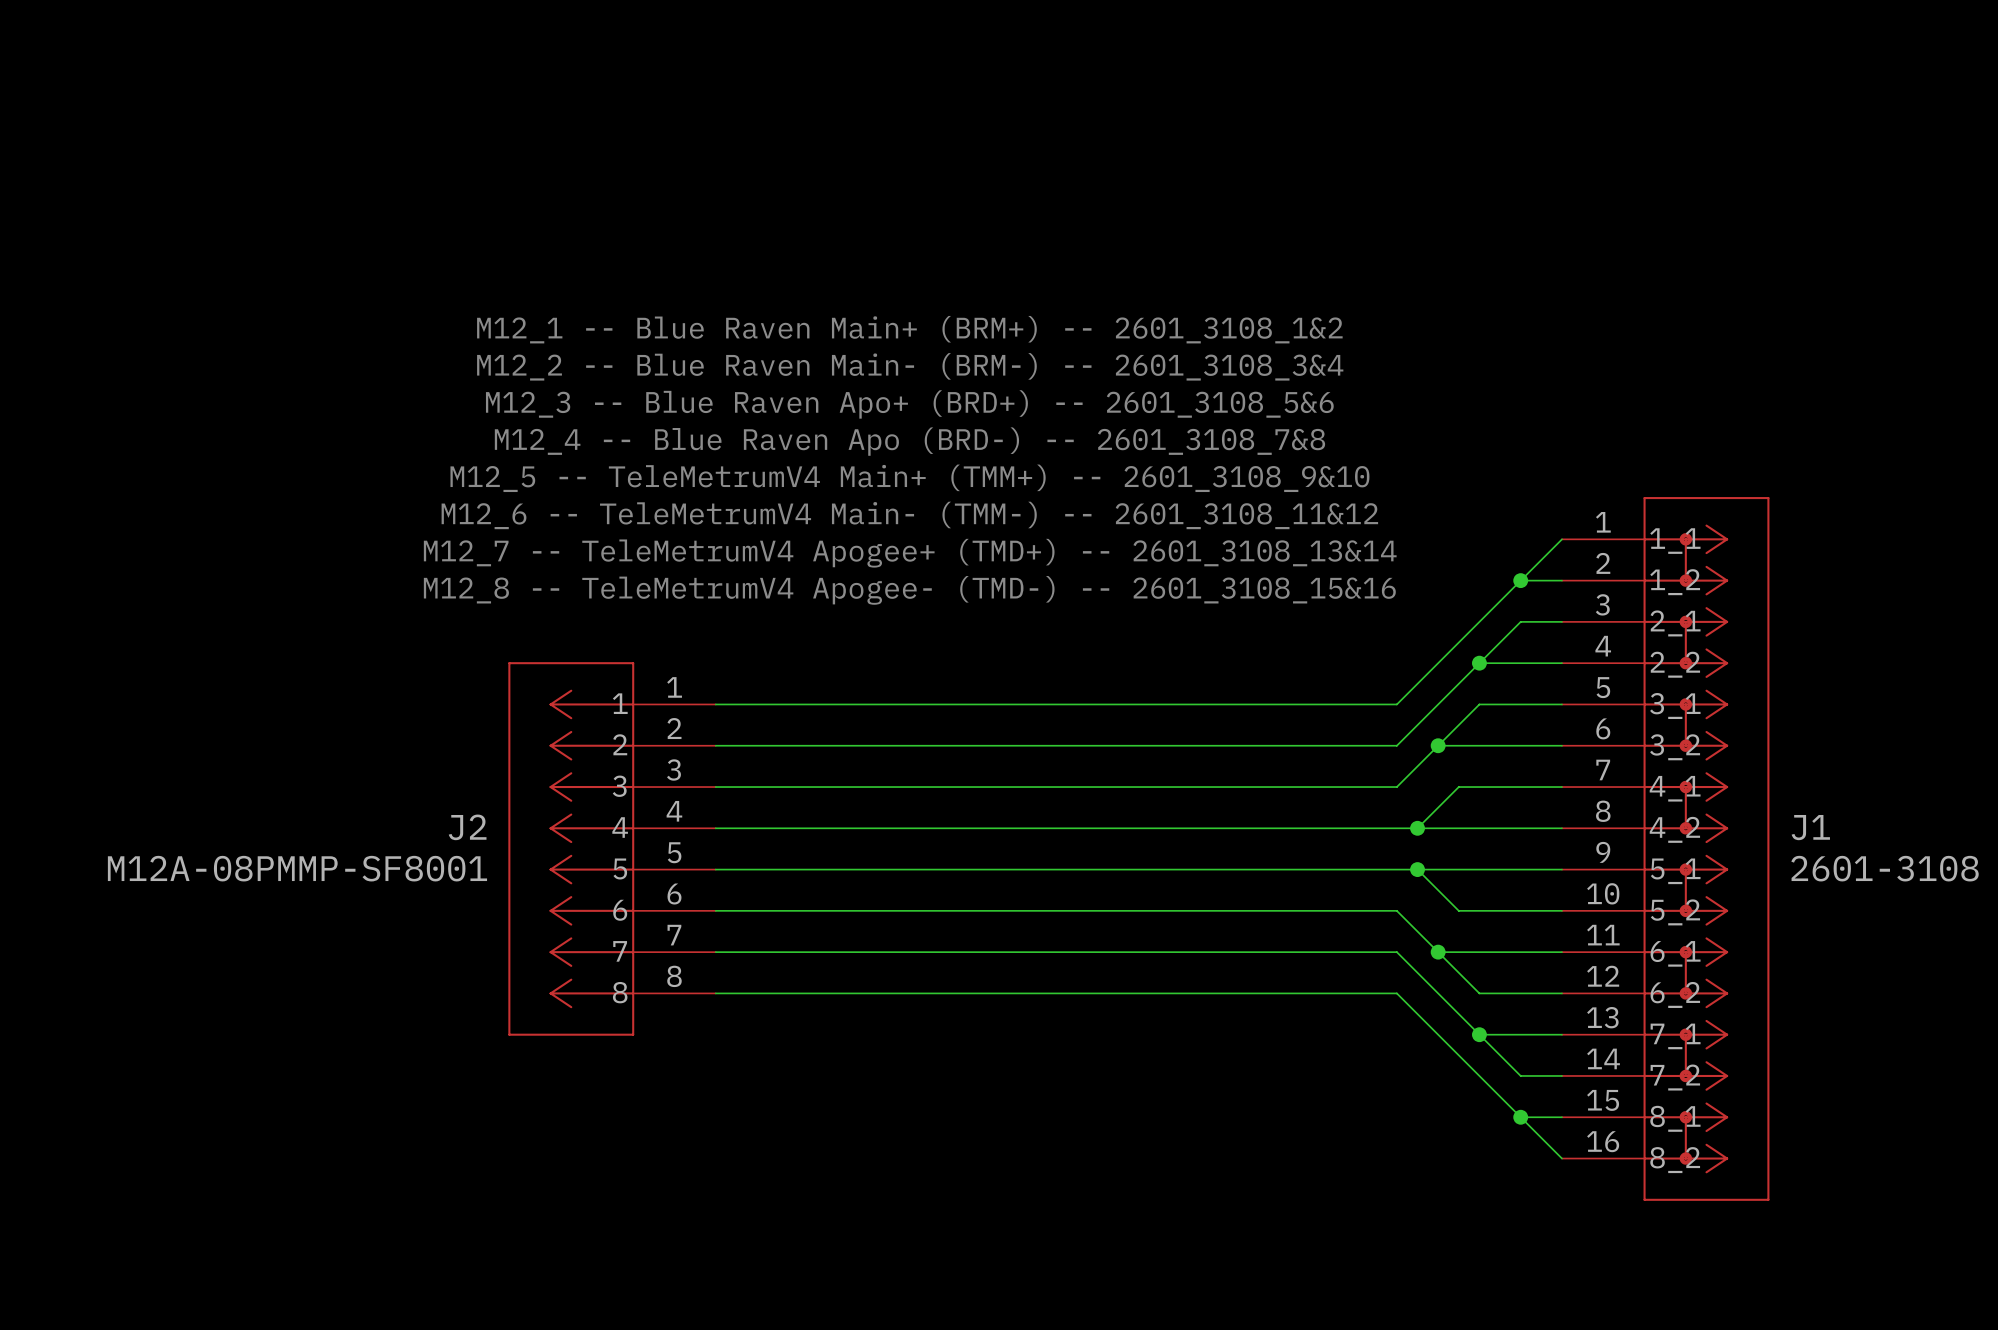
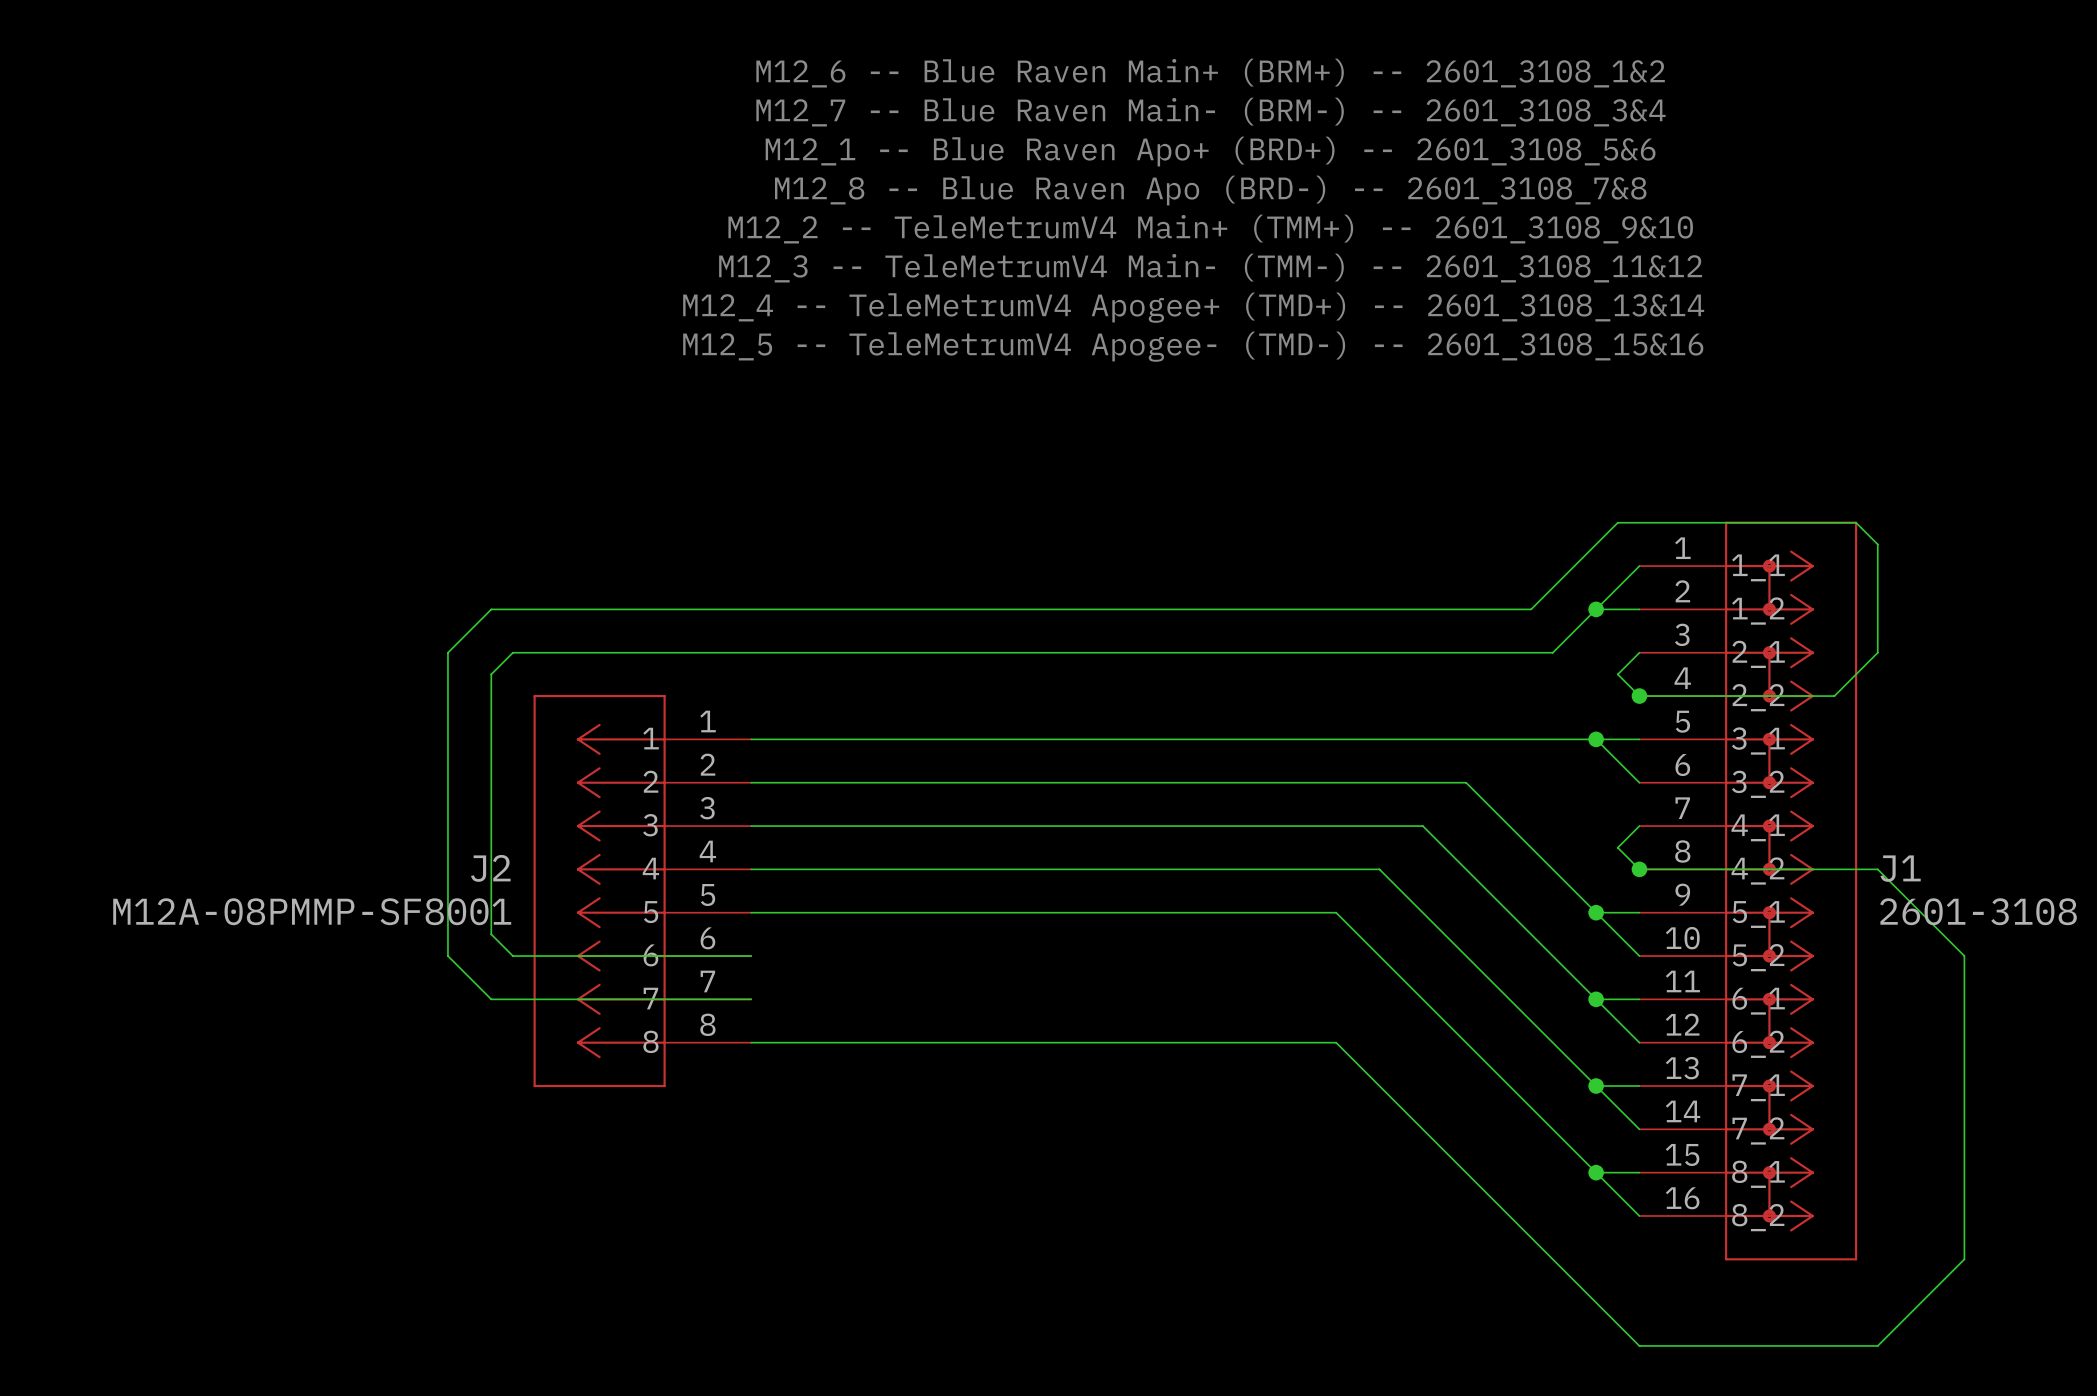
text: none -> M12_6 -- Blue Raven Main+ (BRM+) -- 2601_3108_1&2 (1210, 73)
text: none -> M12_7 -- Blue Raven Main- (BRM-) -- 2601_3108_3&4 (1210, 112)
text: none -> M12_1 -- Blue Raven Apo+ (BRD+) -- 2601_3108_5&6 (1210, 151)
text: none -> M12_8 -- Blue Raven Apo (BRD-) -- 2601_3108_7&8 (1210, 190)
text: none -> M12_2 -- TeleMetrumV4 Main+ (TMM+) -- 2601_3108_9&10 (1210, 229)
text: none -> M12_3 -- TeleMetrumV4 Main- (TMM-) -- 2601_3108_11&12 (1210, 268)
text: none -> M12_4 -- TeleMetrumV4 Apogee+ (TMD+) -- 2601_3108_13&14 (1193, 307)
text: M12_1 -- Blue Raven Main+ (BRM+) -- 2601_3108_1&2 (909, 329) -> none
text: none -> M12_5 -- TeleMetrumV4 Apogee- (TMD-) -- 2601_3108_15&16 (1193, 346)
text: M12_2 -- Blue Raven Main- (BRM-) -- 2601_3108_3&4 (910, 366) -> none
text: M12_3 -- Blue Raven Apo+ (BRD+) -- 2601_3108_5&6 (909, 404) -> none
text: M12_4 -- Blue Raven Apo (BRD-) -- 2601_3108_7&8 (909, 441) -> none
text: M12_5 -- TeleMetrumV4 Main+ (TMM+) -- 2601_3108_9&10 (909, 478) -> none
text: M12_6 -- TeleMetrumV4 Main- (TMM-) -- 2601_3108_11&12 (909, 515) -> none
text: M12_7 -- TeleMetrumV4 Apogee+ (TMD+) -- 2601_3108_13&14 (910, 553) -> none
text: M12_8 -- TeleMetrumV4 Apogee- (TMD-) -- 2601_3108_15&16 (909, 590) -> none
wire: (1479, 621) (1396, 704) -> (1552, 739) (1466, 739)
wire: (1562, 621) (1520, 621) (1396, 745) -> none
wire: (1479, 663) (1562, 663) -> none
junction: (1479, 663) -> none
junction: none -> (1639, 696)
wire: (1479, 704) (1396, 787) (1355, 787) -> (1639, 1042) (1422, 826)
junction: none -> (1596, 739)
wire: (1438, 745) (1562, 745) -> (1596, 739) (1639, 782)
junction: (1438, 745) -> none
wire: (1562, 787) (1458, 787) (1417, 828) -> (1639, 826) (1617, 847) (1639, 869) (1877, 869) (1964, 956) (1964, 1259) (1877, 1345) (1639, 1345) (1336, 1042)
wire: (1314, 828) (1562, 828) -> (1379, 869) (1466, 956)
junction: (1417, 828) -> none
junction: none -> (1639, 869)
wire: (1273, 869) (1520, 869) -> none
wire: (1417, 869) (1458, 910) (1562, 910) -> (1466, 782) (1639, 956)
junction: (1417, 869) -> none
junction: none -> (1596, 912)
wire: (715, 910) (1396, 910) -> (751, 956) (512, 956) (491, 934) (491, 674) (512, 652) (1552, 652)
wire: (715, 952) (1396, 952) (1520, 1075) (1562, 1075) -> (751, 999) (491, 999) (447, 956) (447, 652) (491, 609) (1531, 609) (1617, 522) (1856, 522) (1877, 544) (1877, 652) (1834, 696) (1639, 696) (1617, 674) (1639, 652)
wire: (1438, 952) (1520, 952) -> none
junction: (1438, 952) -> none
junction: none -> (1596, 999)
wire: (1273, 993) (1396, 993) -> (1336, 912) (1466, 1042)
wire: (1479, 993) (1562, 993) -> (1552, 1042) (1639, 1129)
wire: (1479, 1034) (1520, 1034) -> none
junction position: (1479, 1034) -> (1596, 1086)

